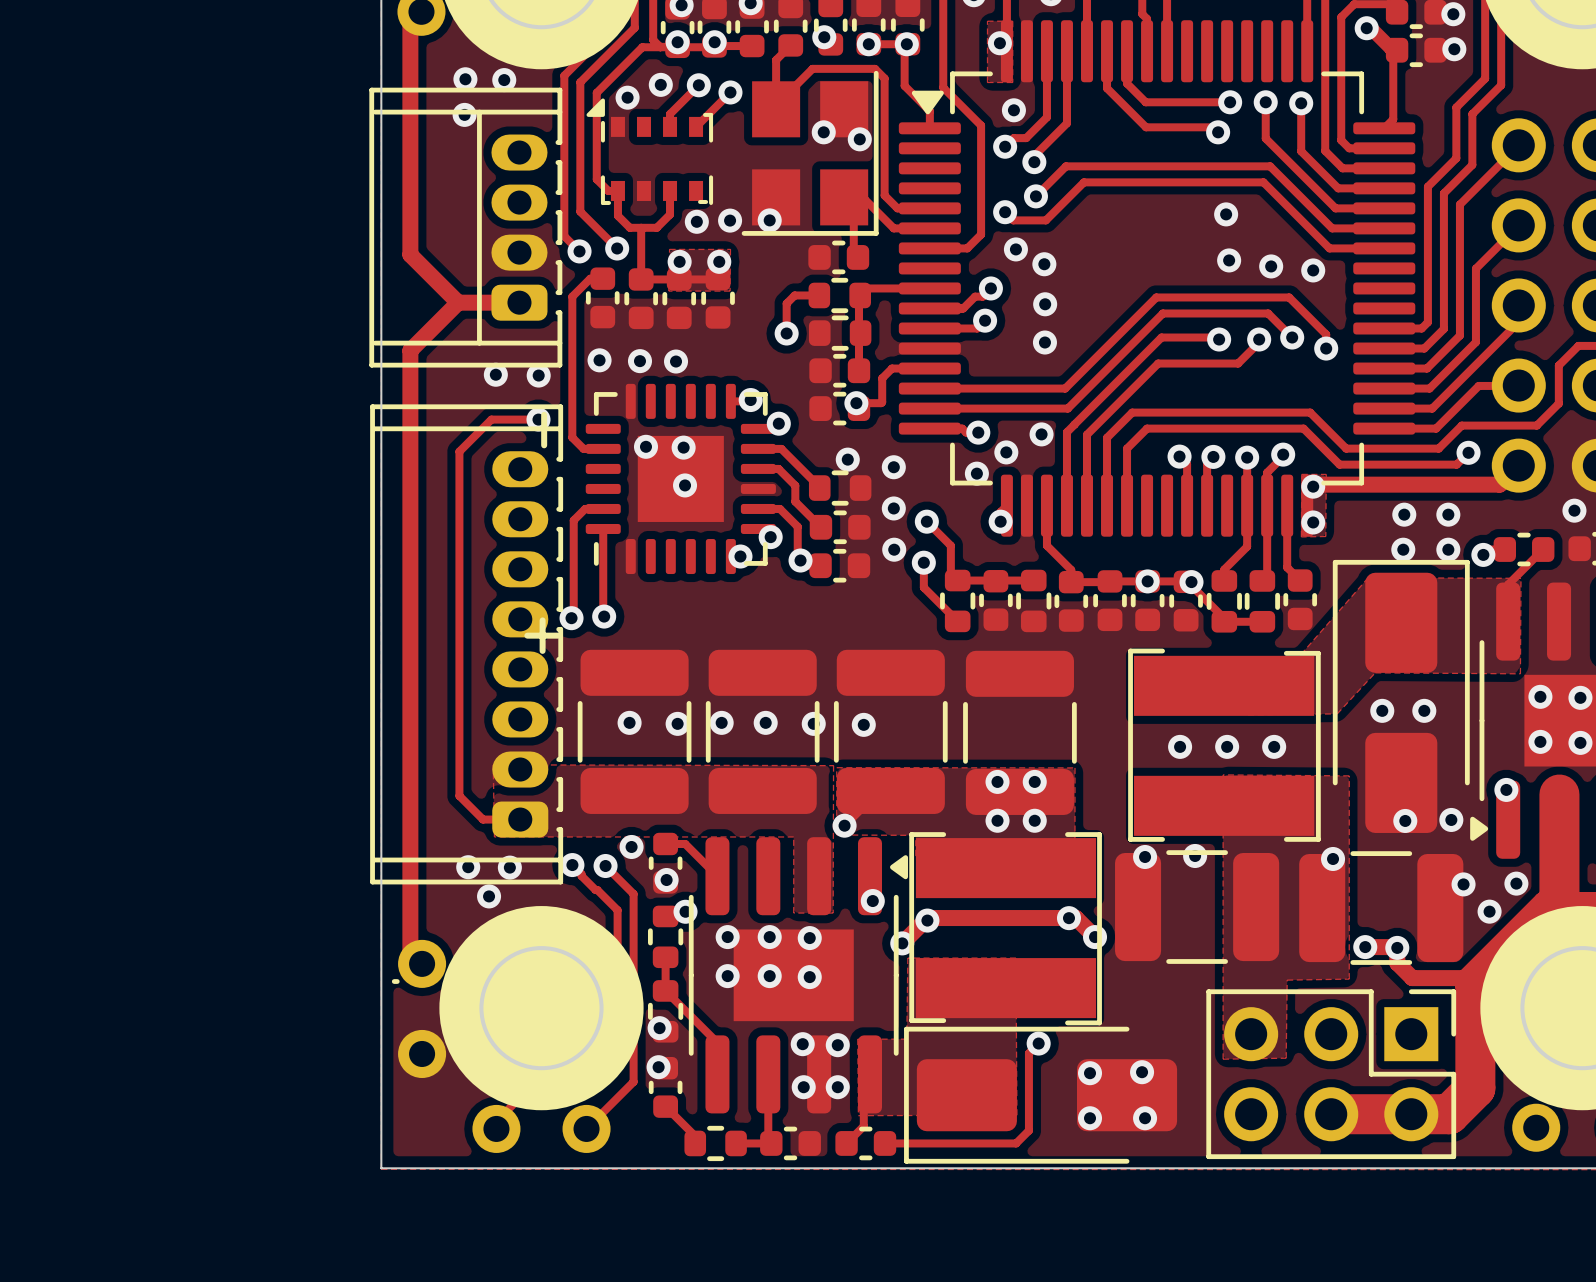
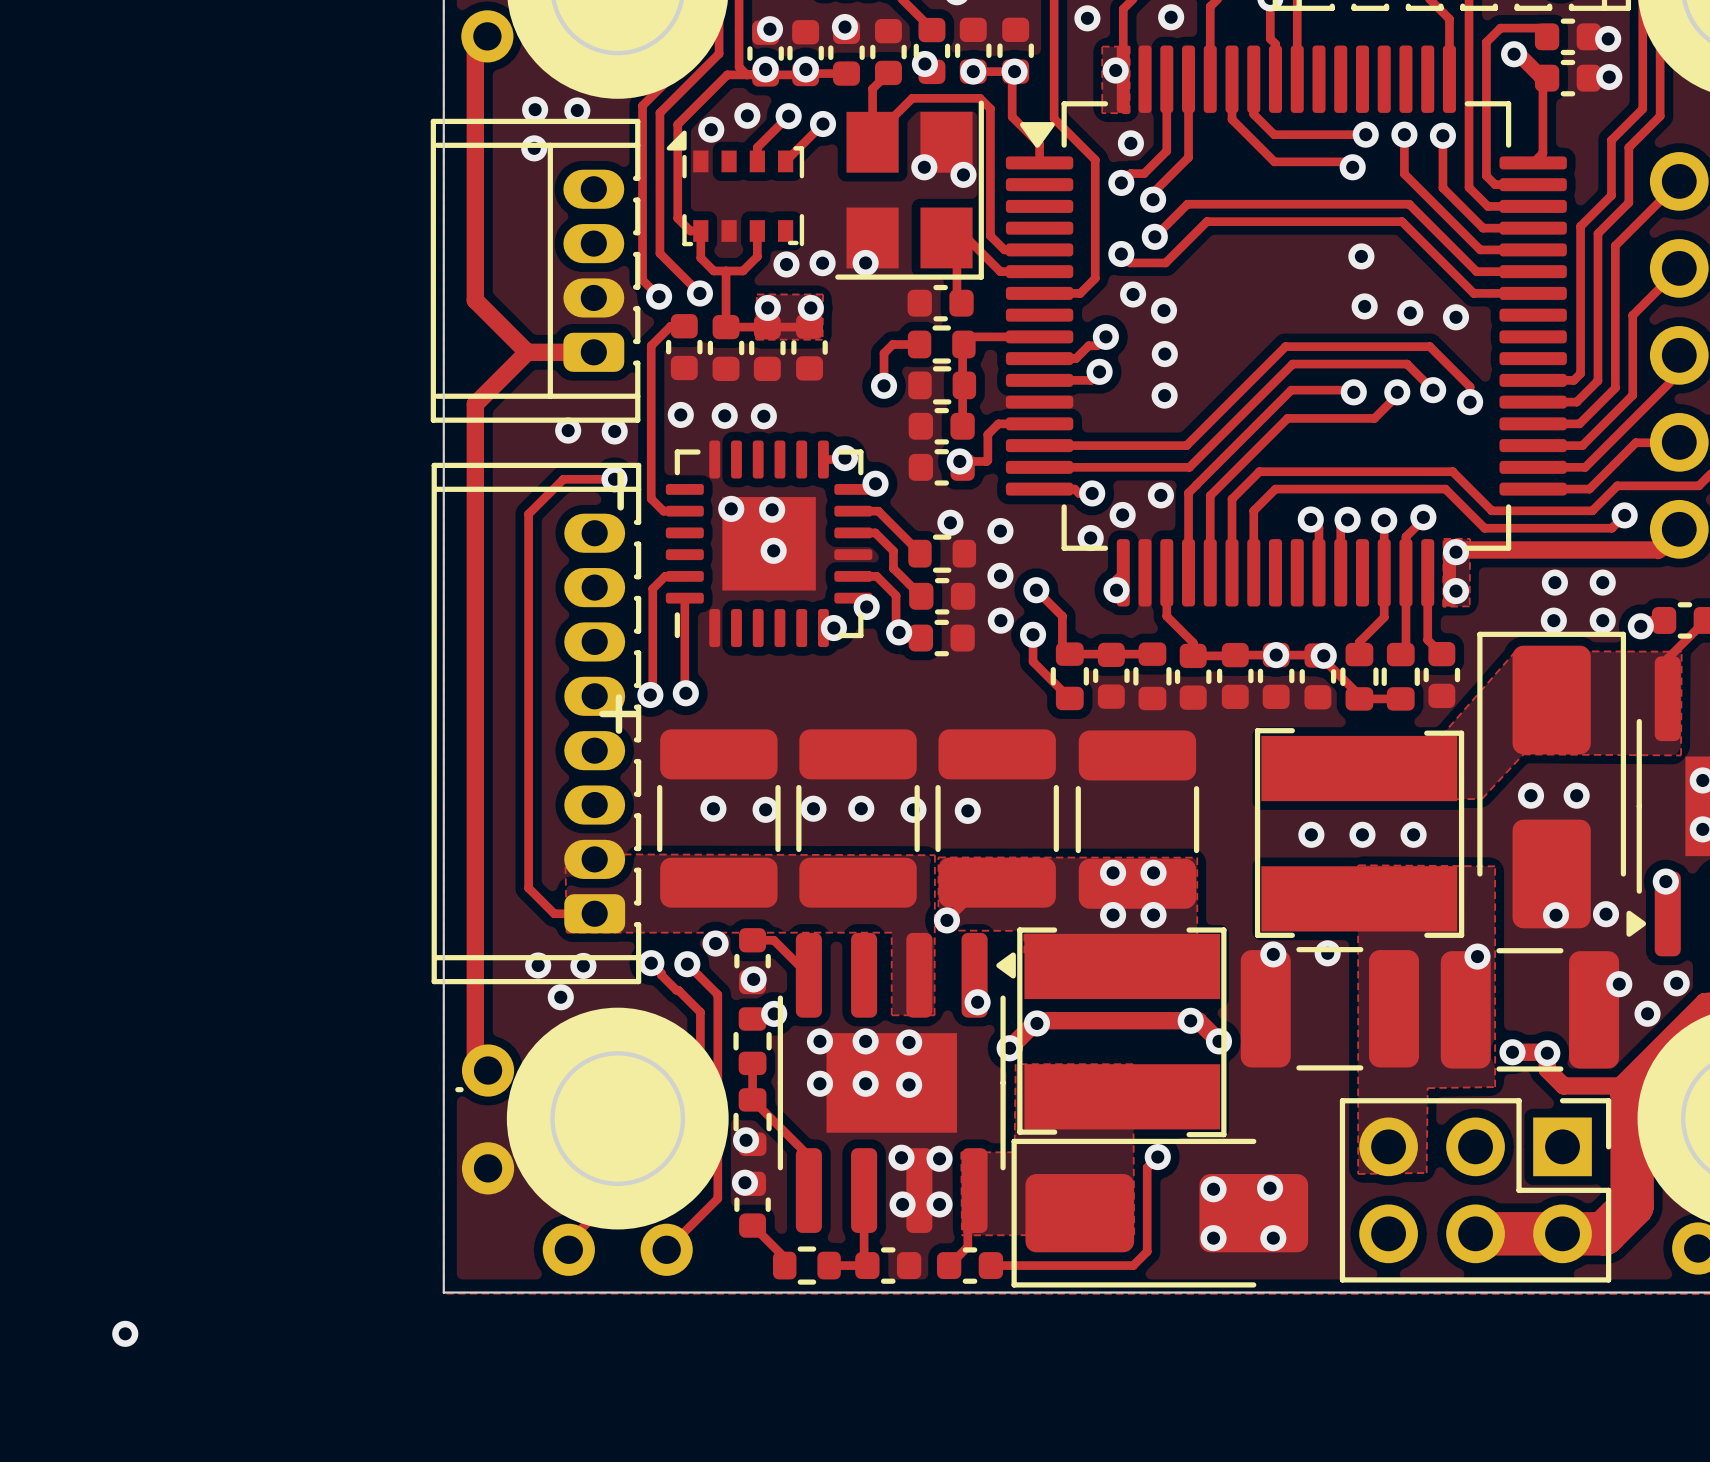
via: none -> (125, 1333)

